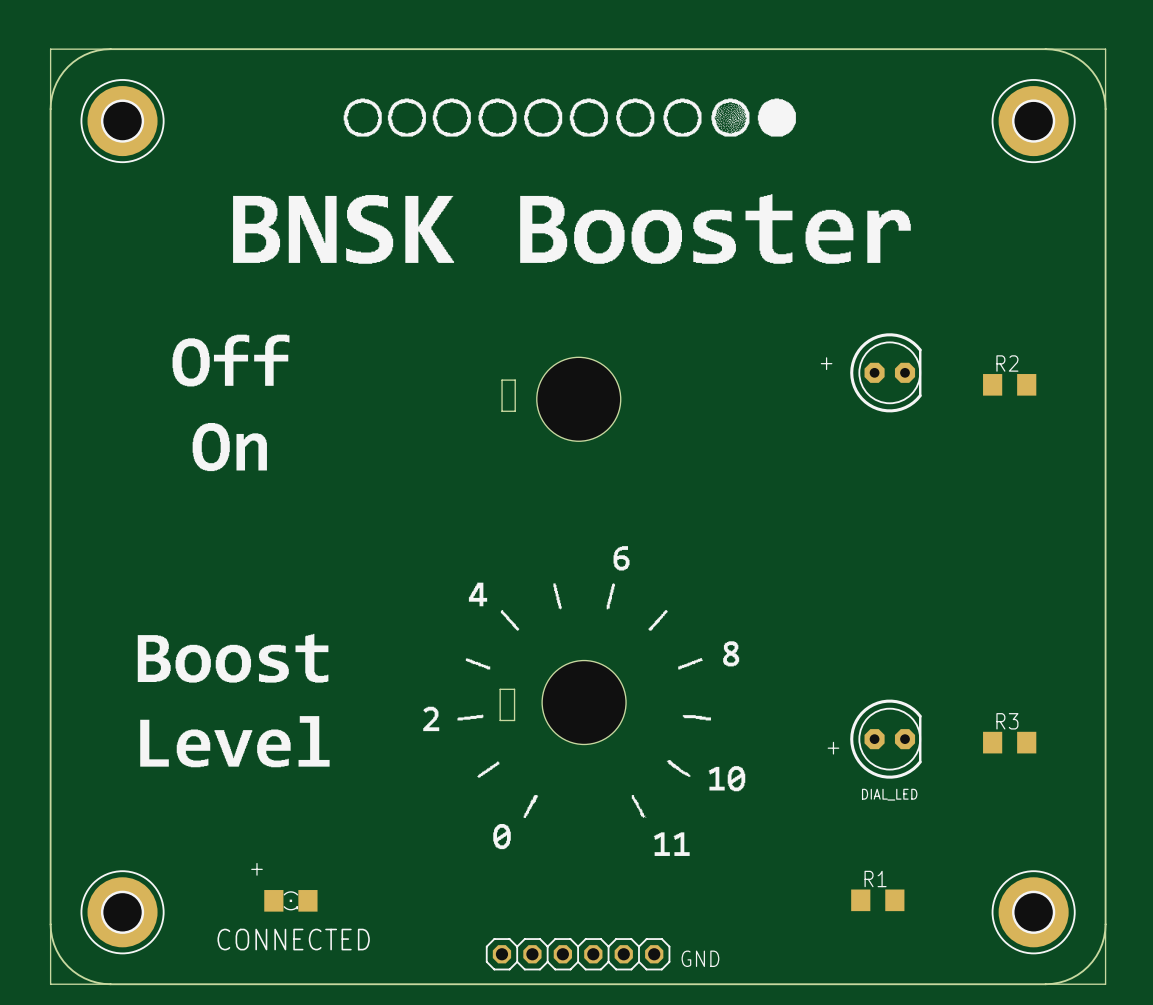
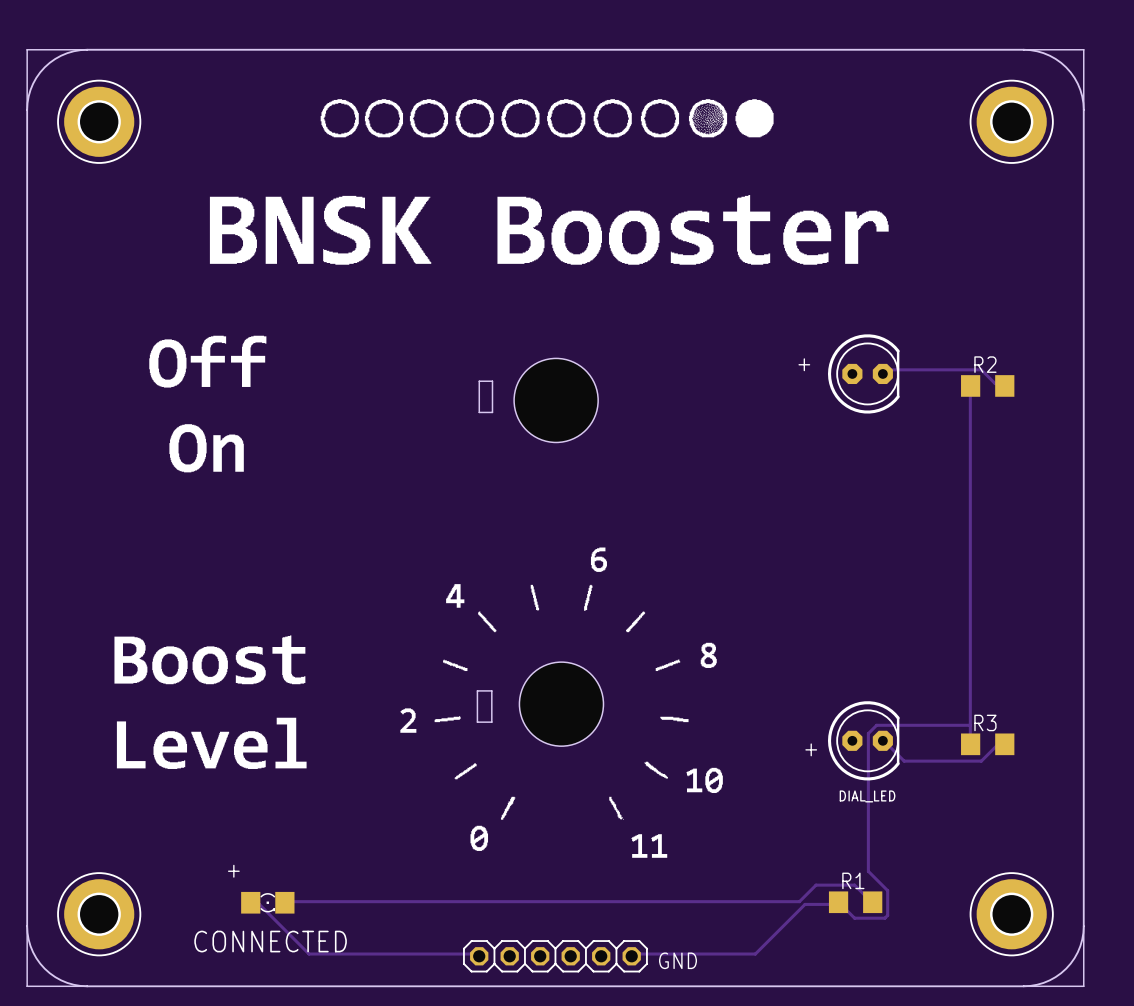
track: none -> (882, 373) (887, 369) (981, 369) (995, 383) (1003, 383) (1004, 385)
track: none -> (970, 385) (970, 744)
track: none -> (970, 725) (876, 725) (868, 733) (868, 871) (887, 890) (887, 915) (884, 918) (854, 918) (838, 902) (838, 904) (805, 904) (755, 954) (634, 954) (631, 956)
track: none -> (882, 740) (904, 761) (981, 761) (997, 744) (1004, 744)
track: none -> (250, 902) (251, 904) (259, 904) (309, 954) (477, 954) (479, 956)
track: none -> (872, 902) (854, 885) (816, 885) (799, 901) (284, 902)

